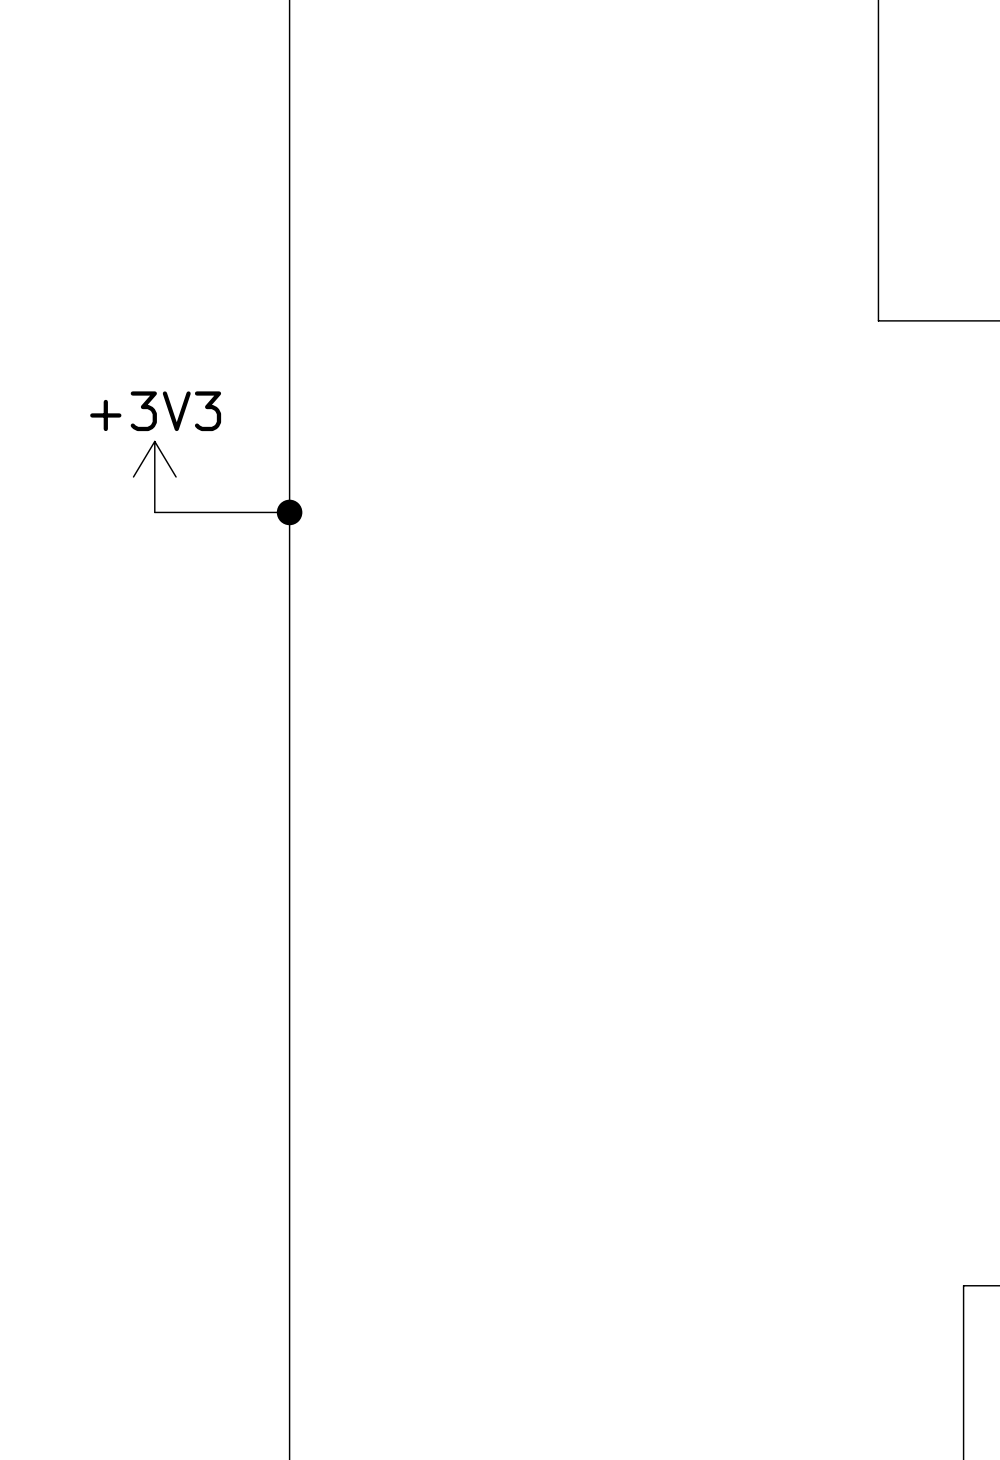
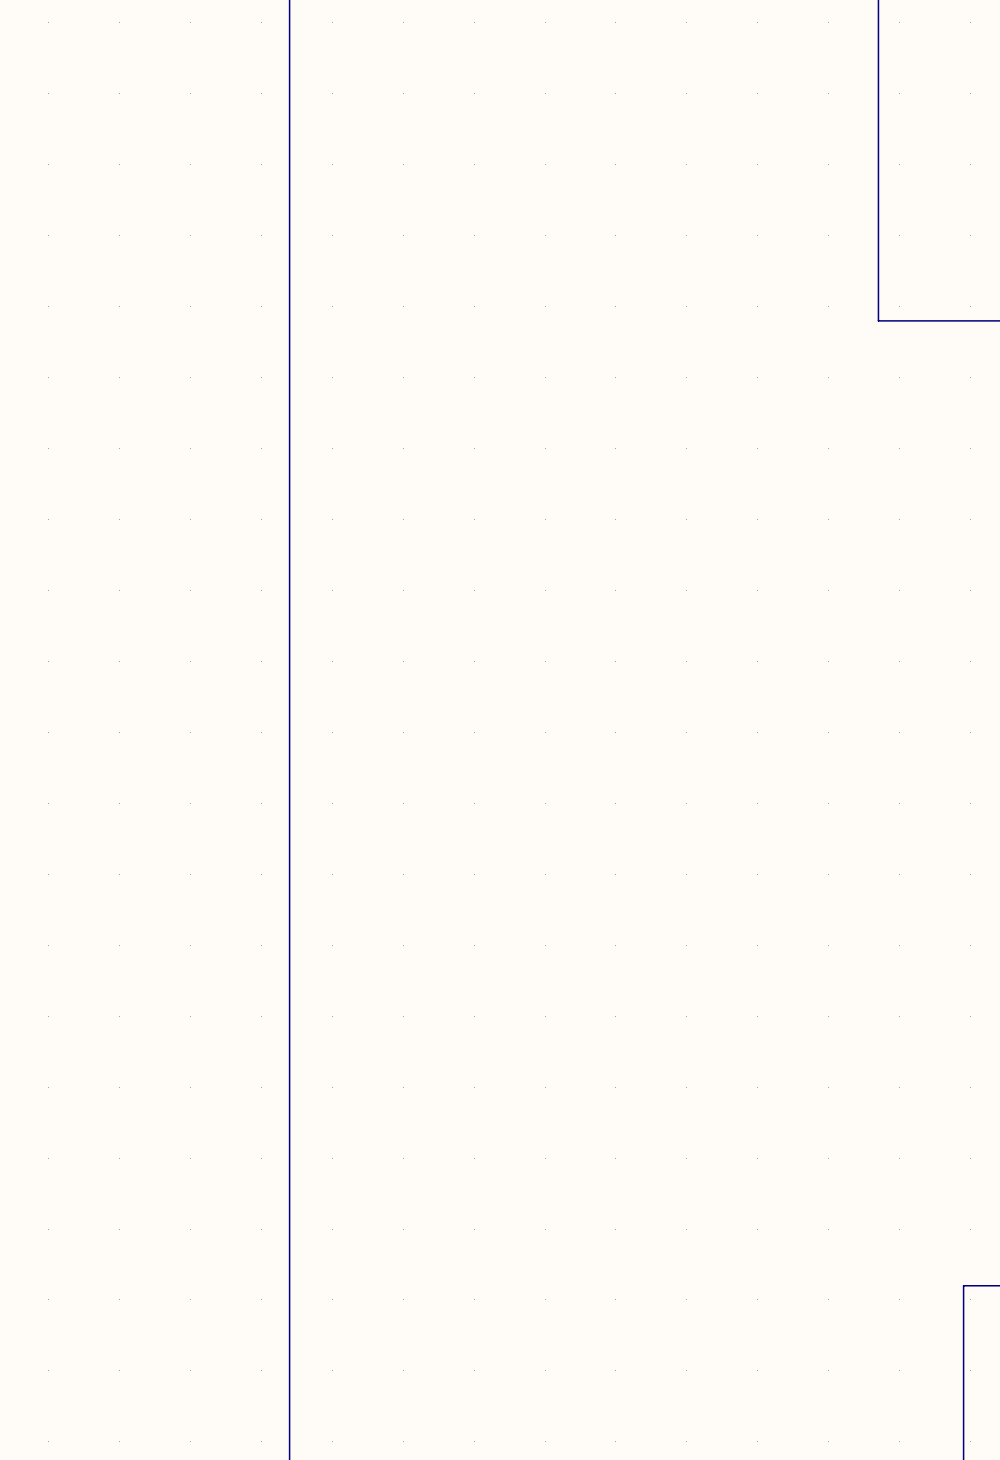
power symbol: +3V3 (154, 476) -> none
wire: (154, 512) (289, 512) -> none
junction: (289, 512) -> none

